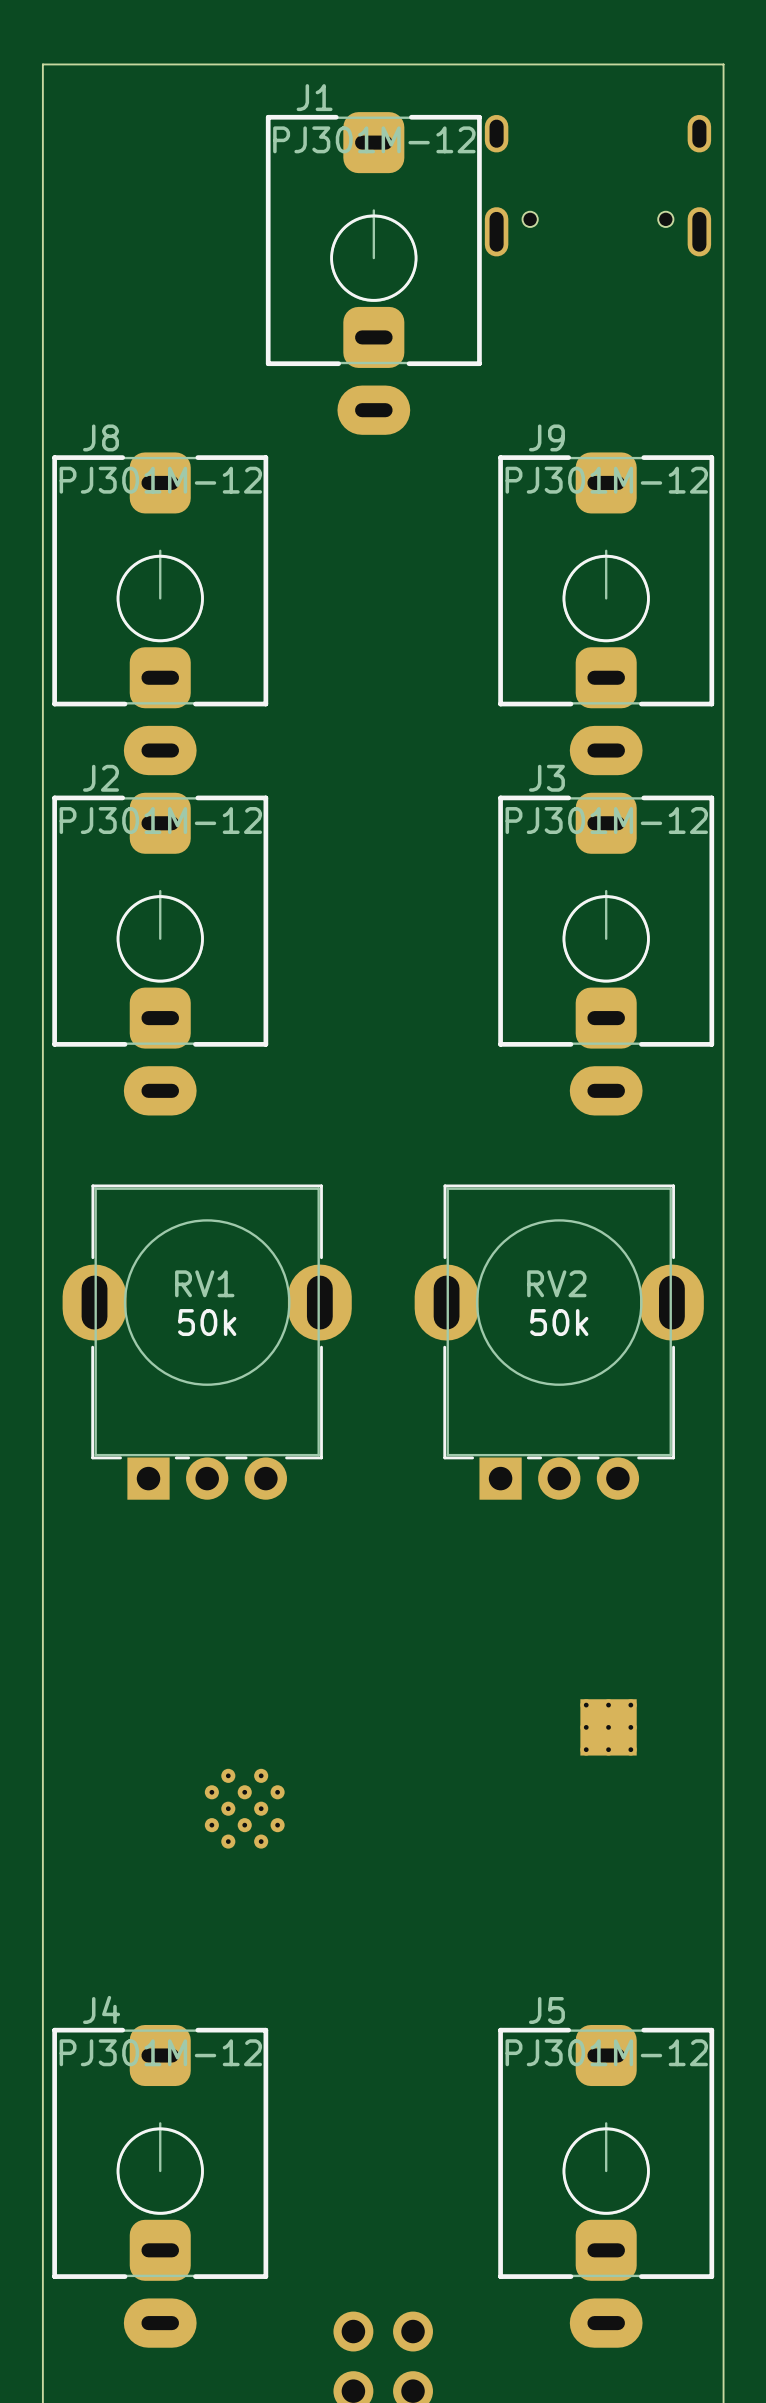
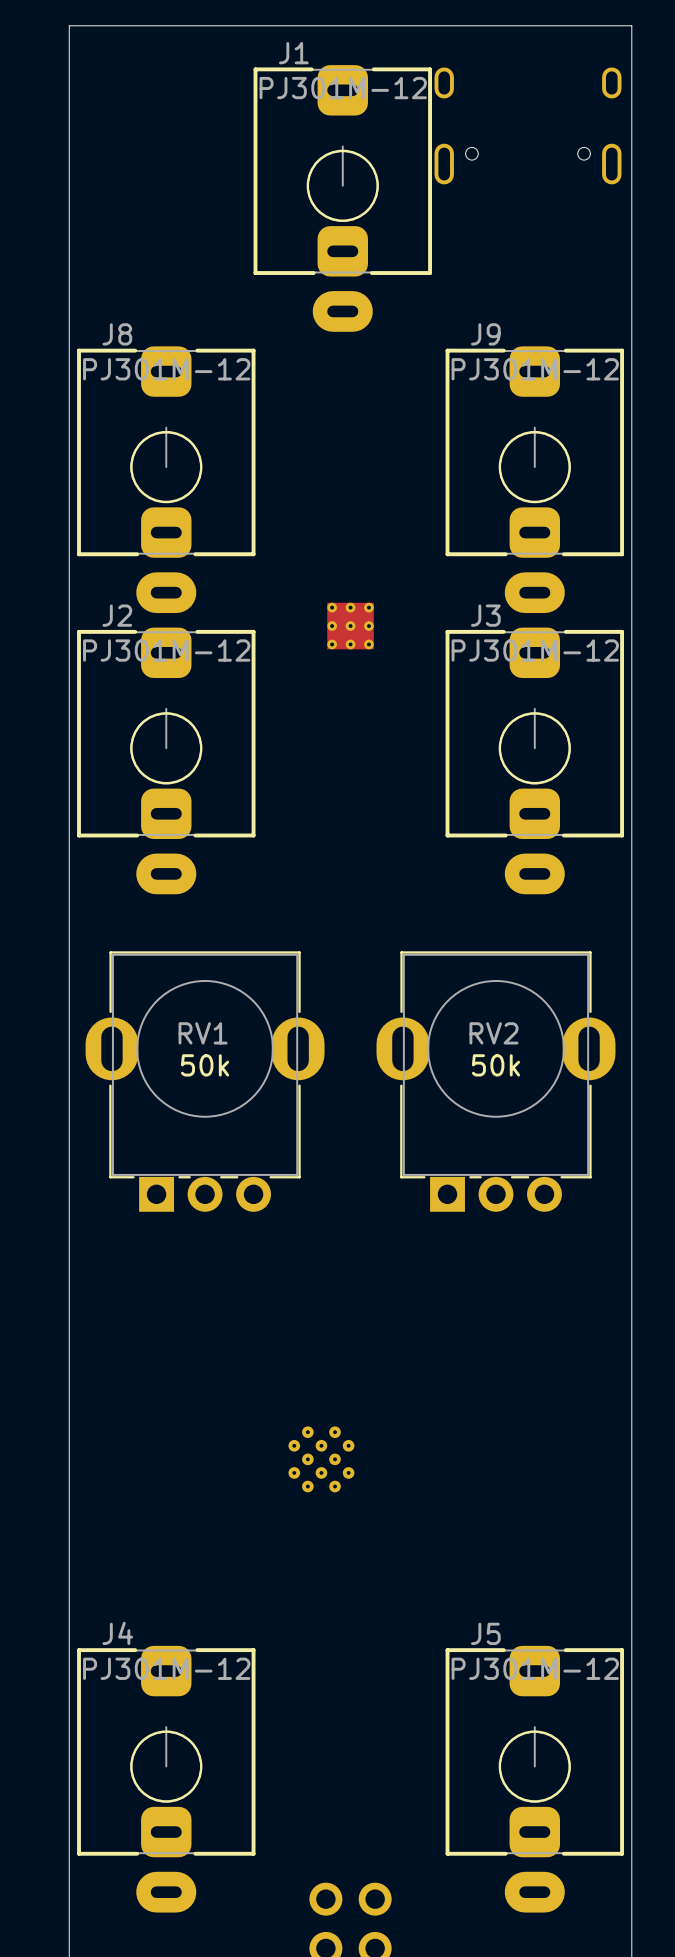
part: none -> (350, 626)
part: (608, 1727) -> none
part position: (244, 1808) -> (321, 1459)

